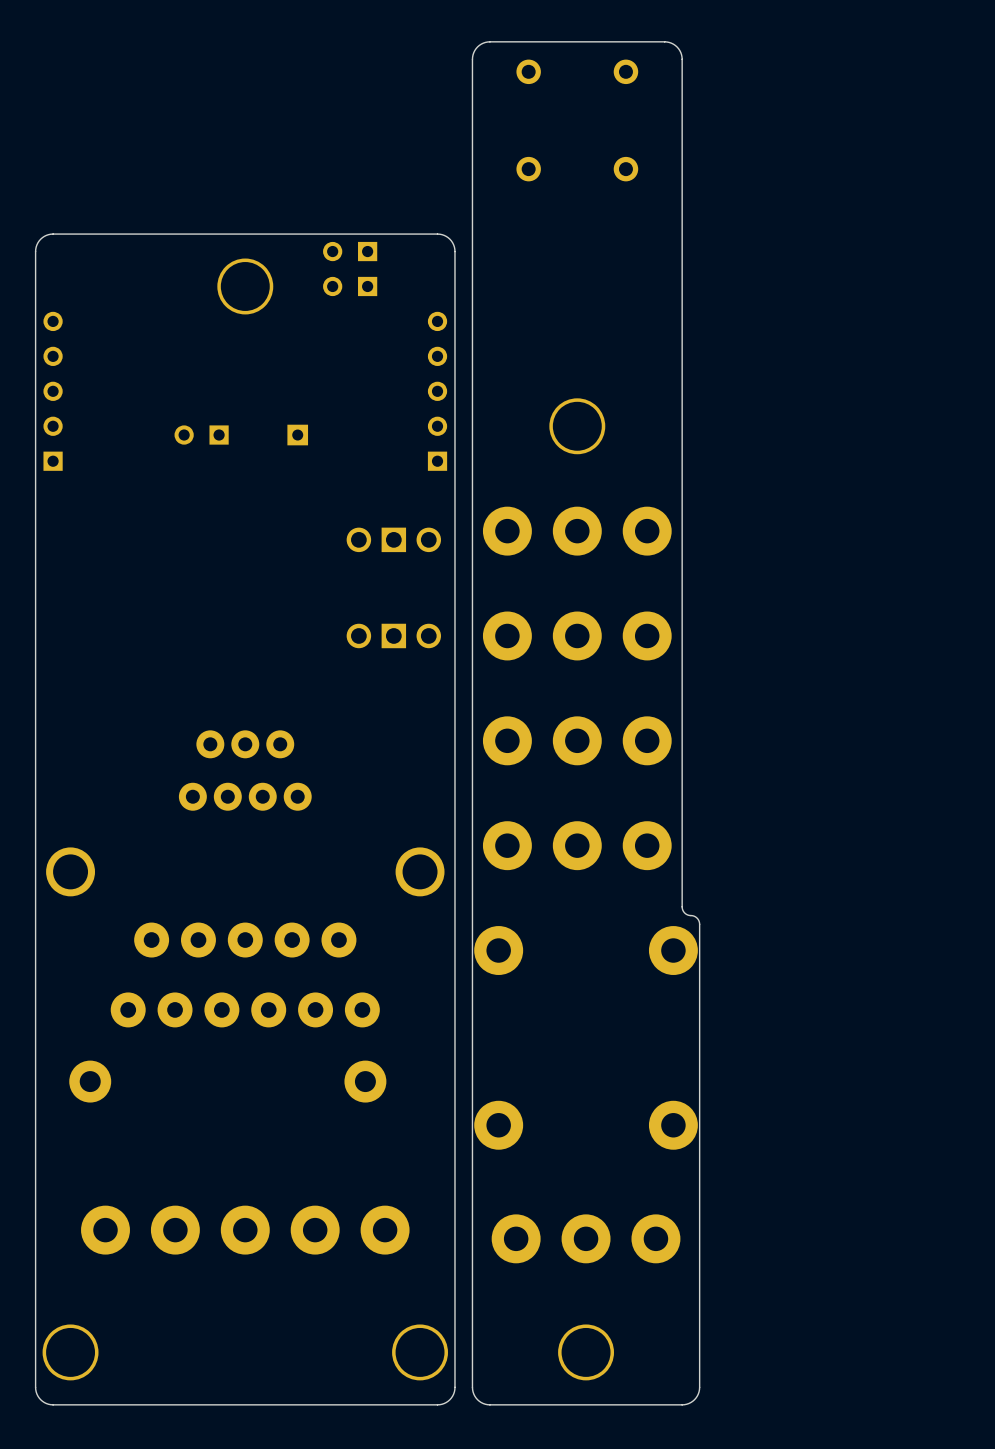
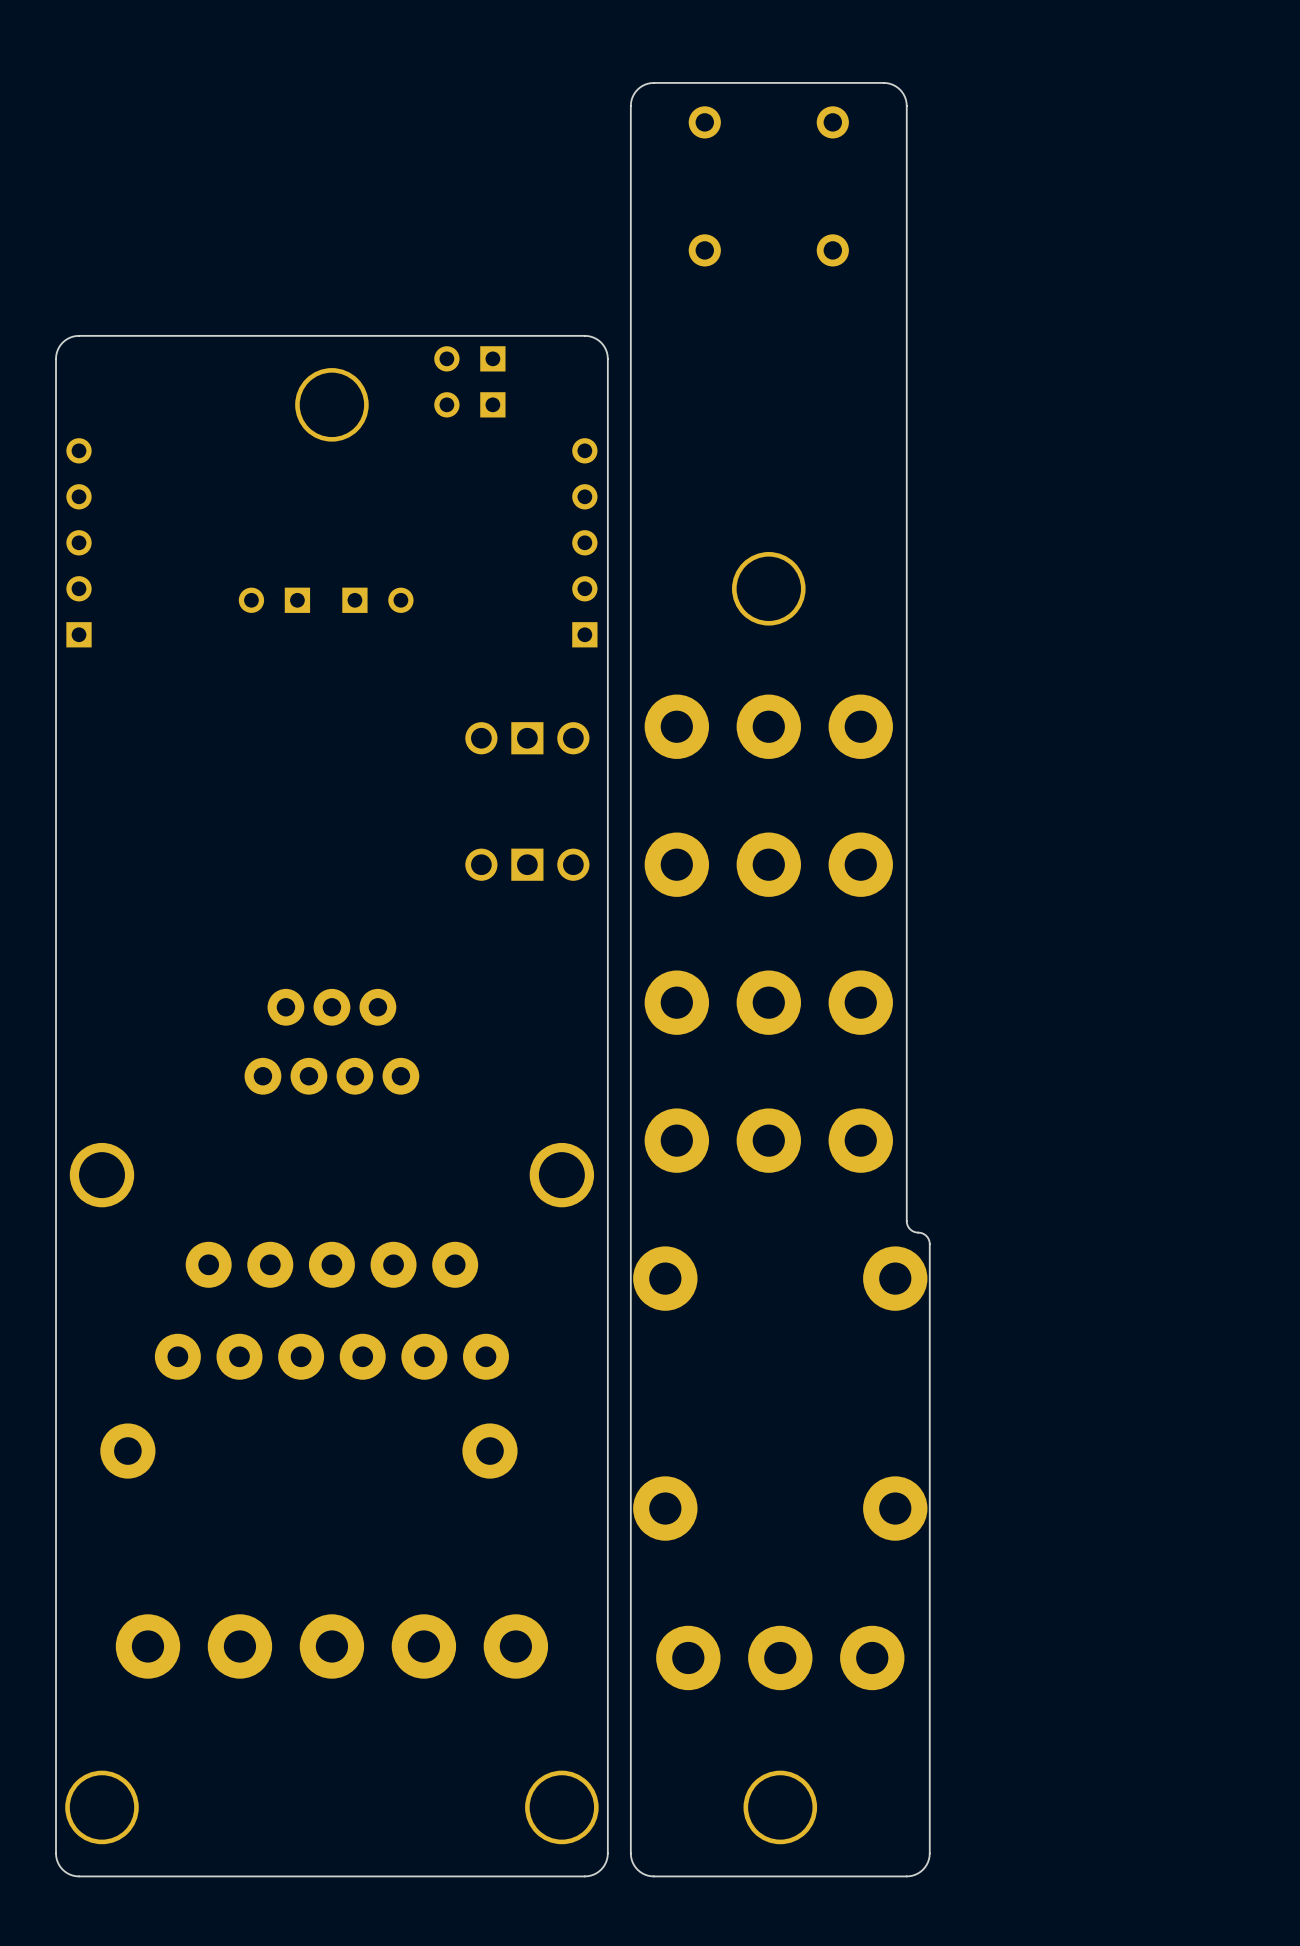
part: none -> (377, 600)
part: (297, 435) -> none

